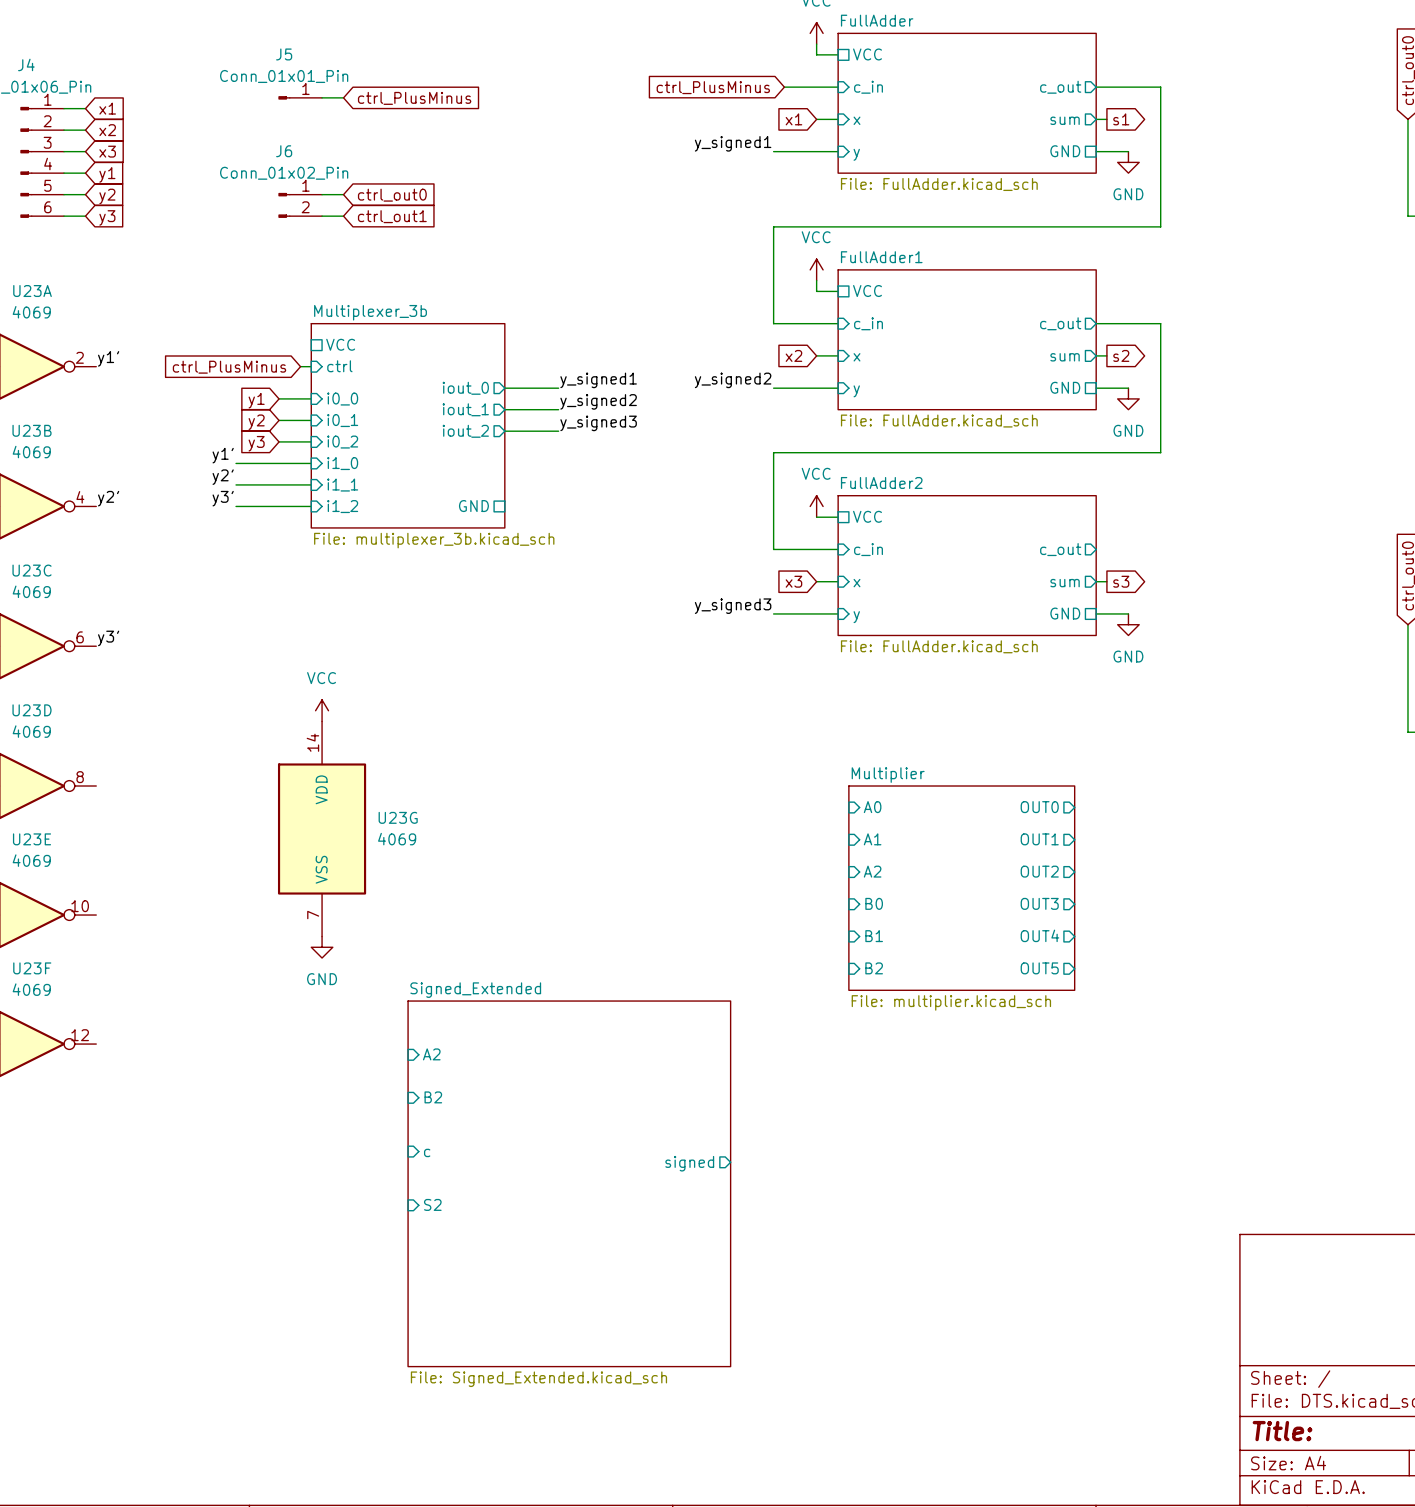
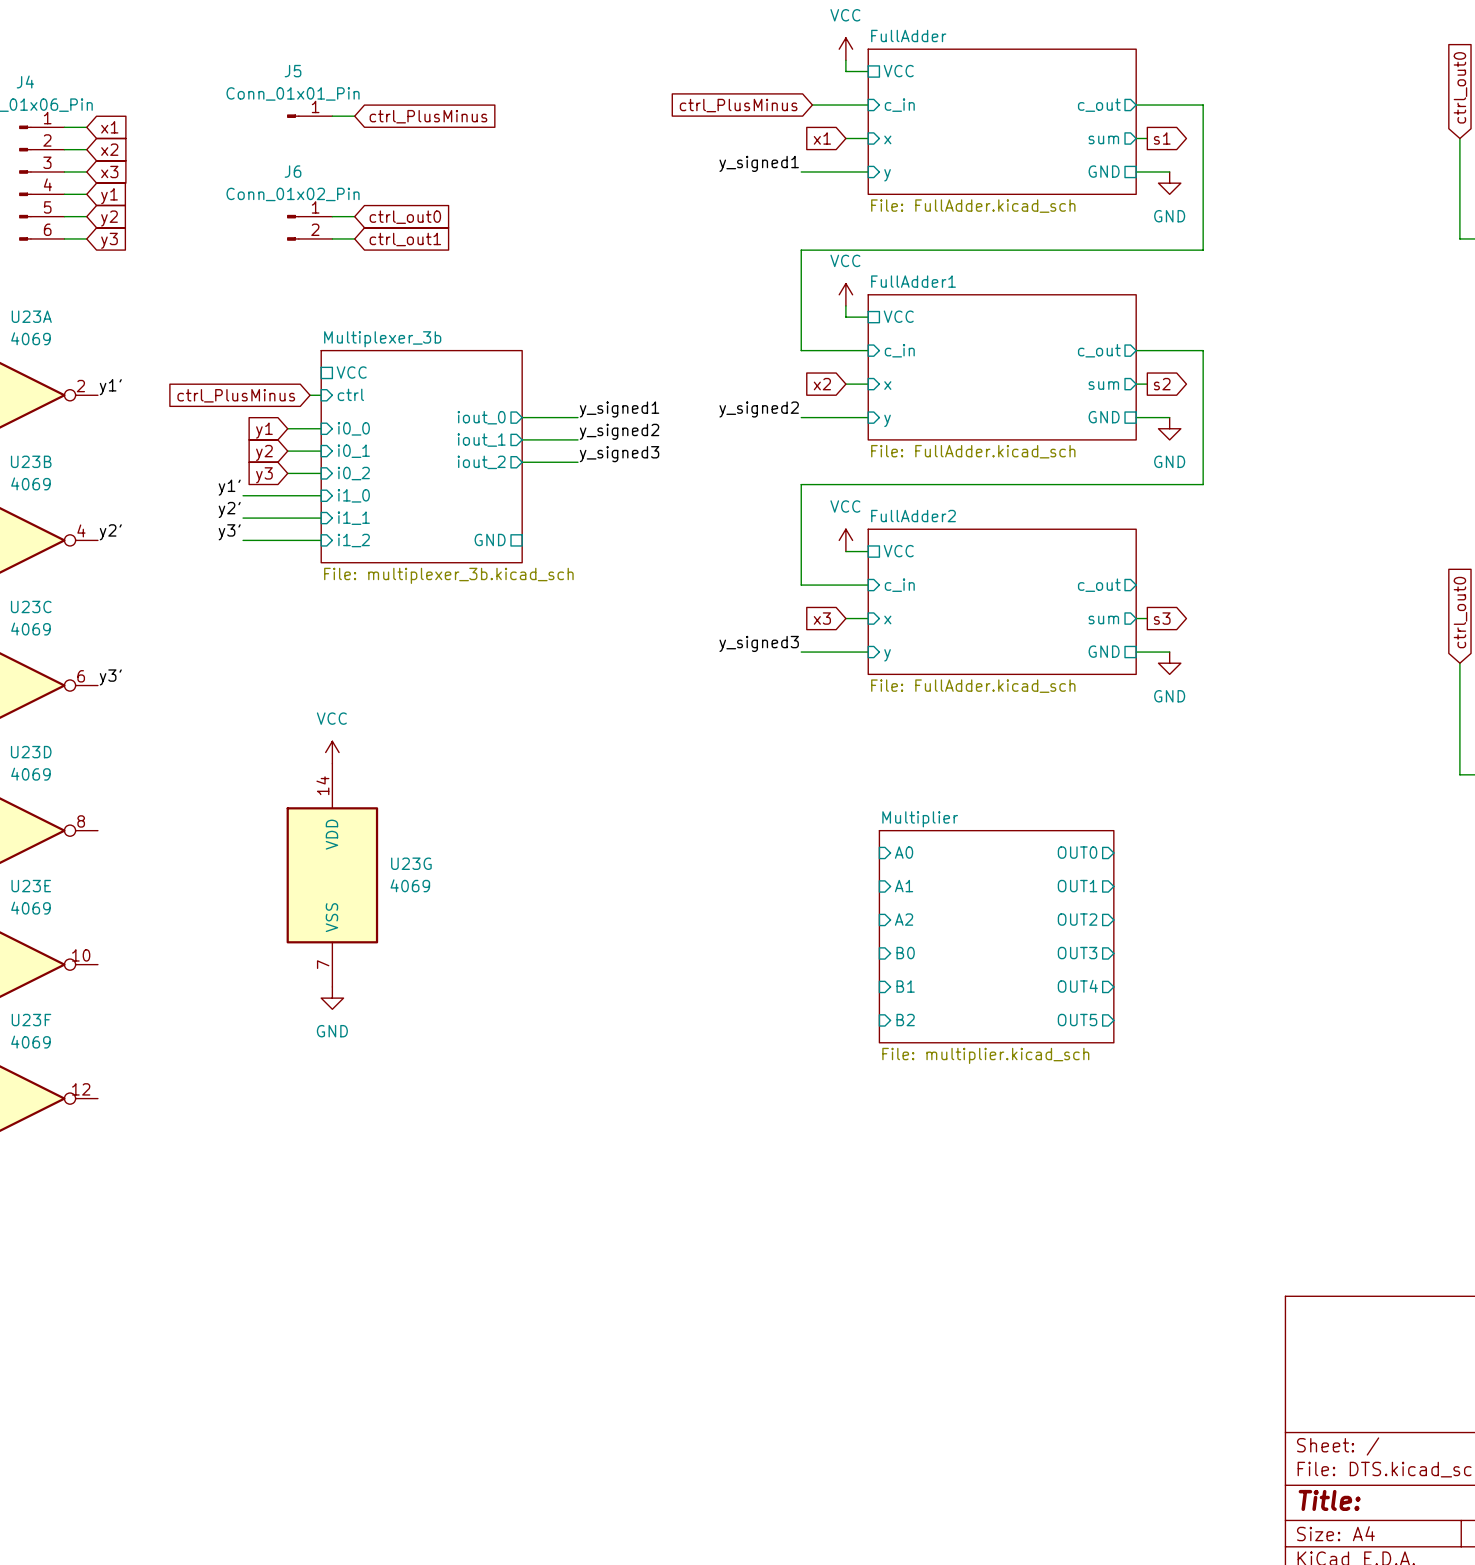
sheet pin: A2 (431, 1054) -> none
sheet pin: B2 (433, 1097) -> none
sheet pin: c (427, 1152) -> none
sheet pin: signed (689, 1163) -> none
sheet Signed_Extended: File: Signed_Extended.kicad_sch (569, 1183) -> none
sheet pin: S2 (432, 1204) -> none

